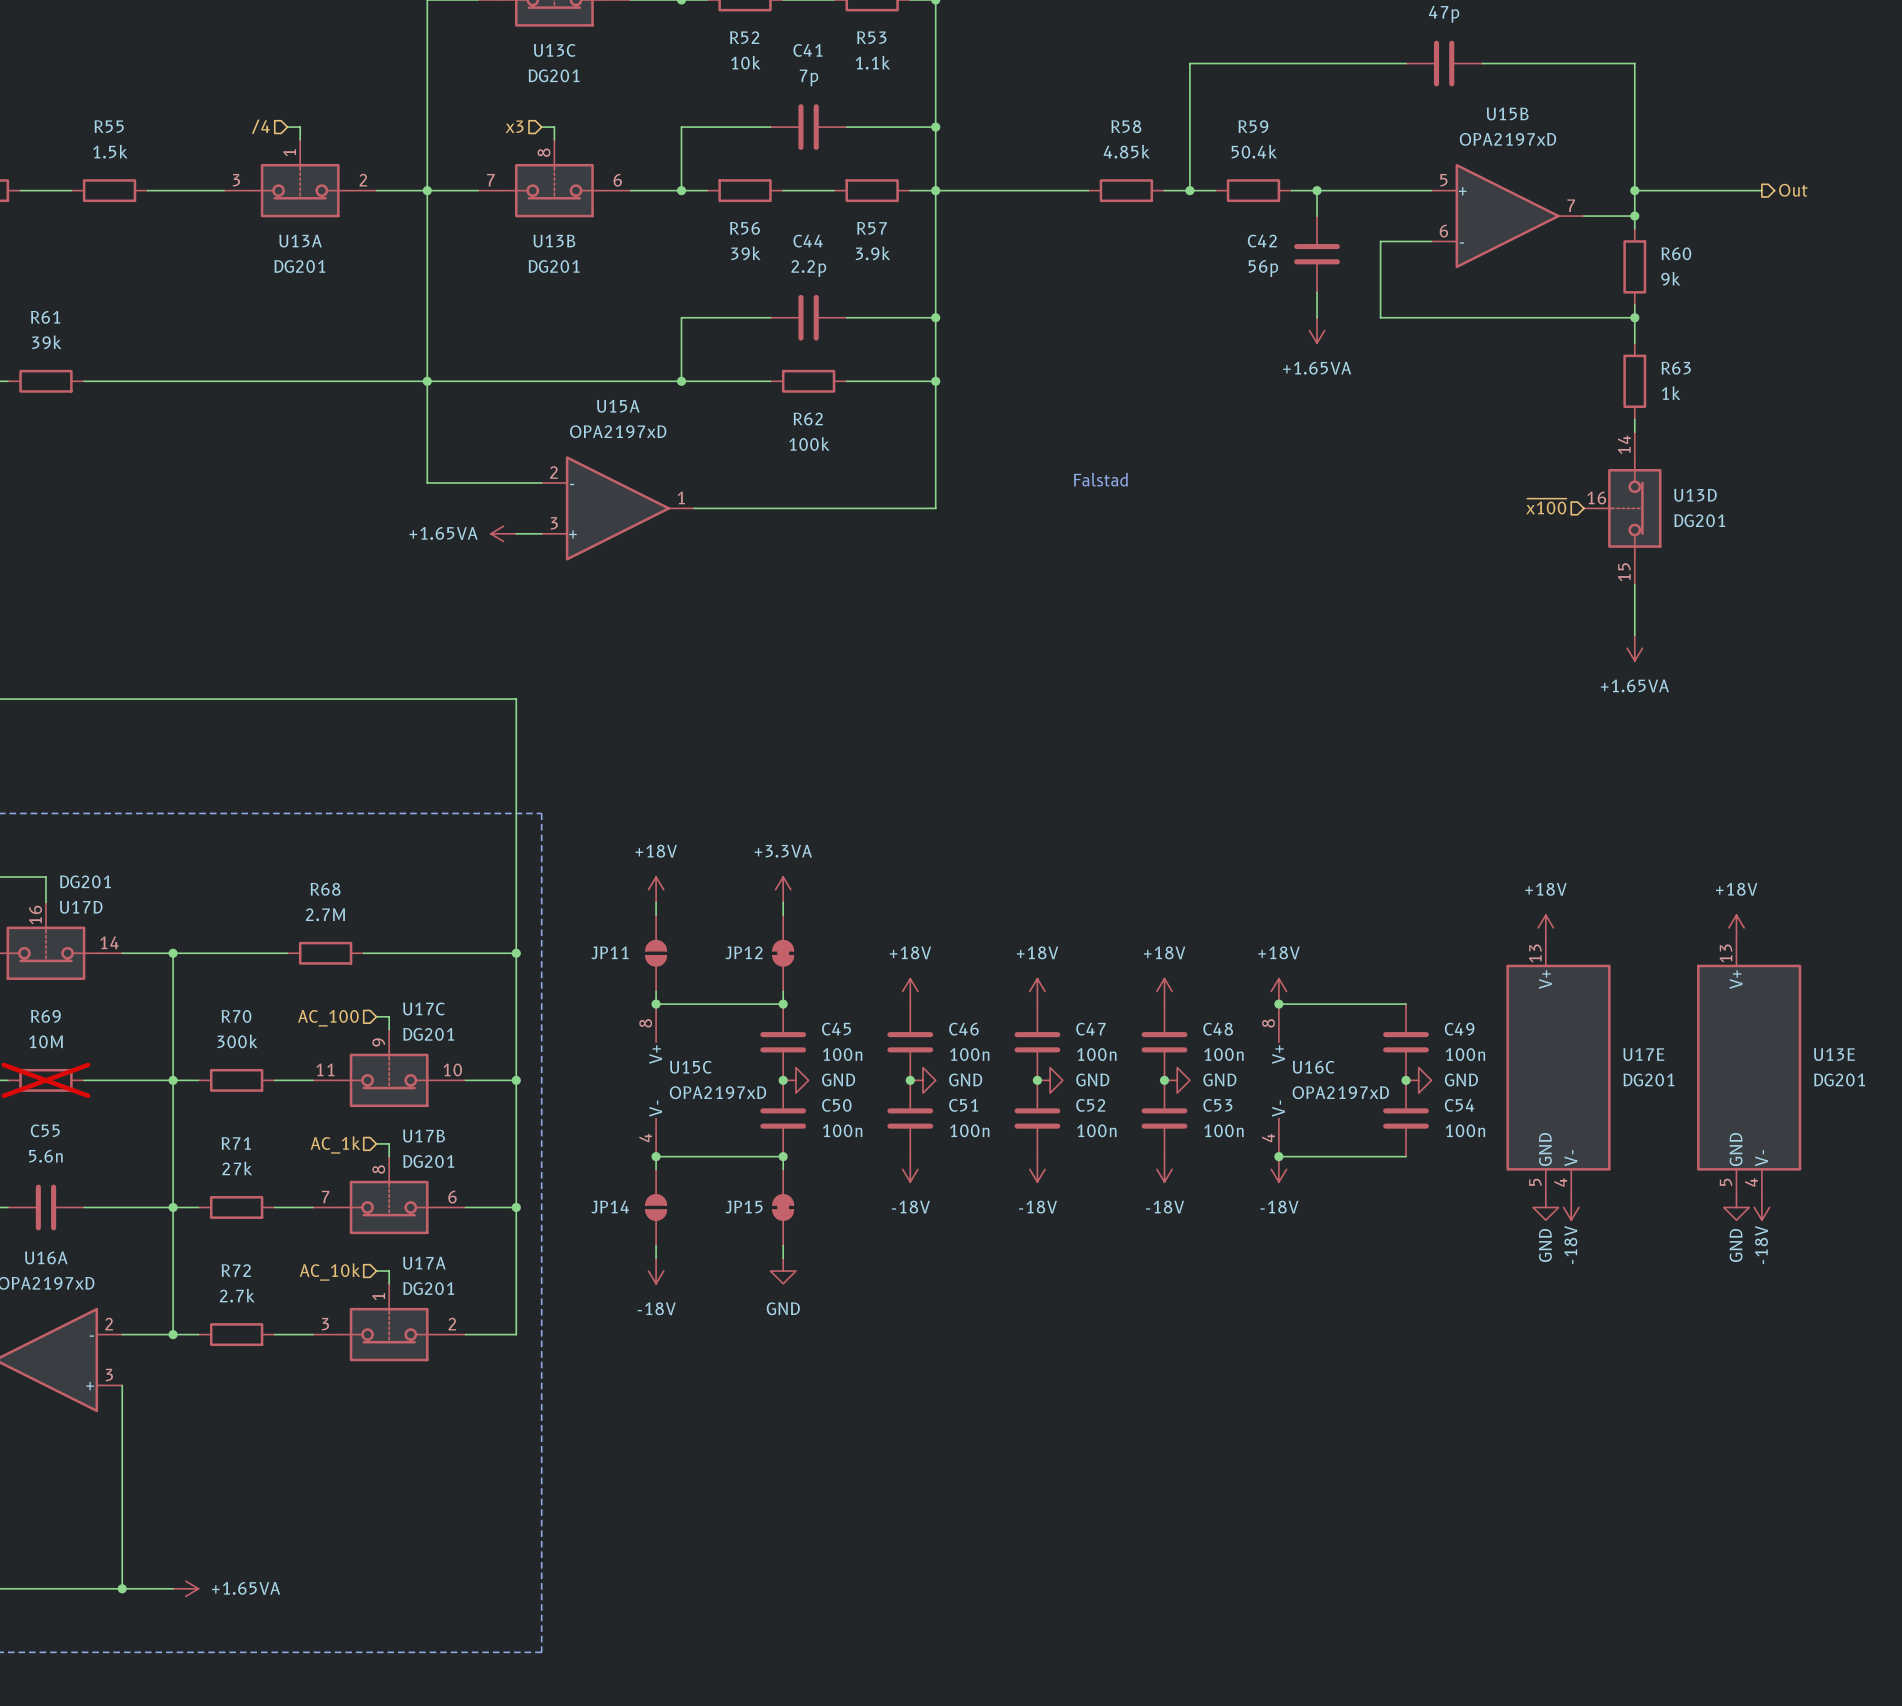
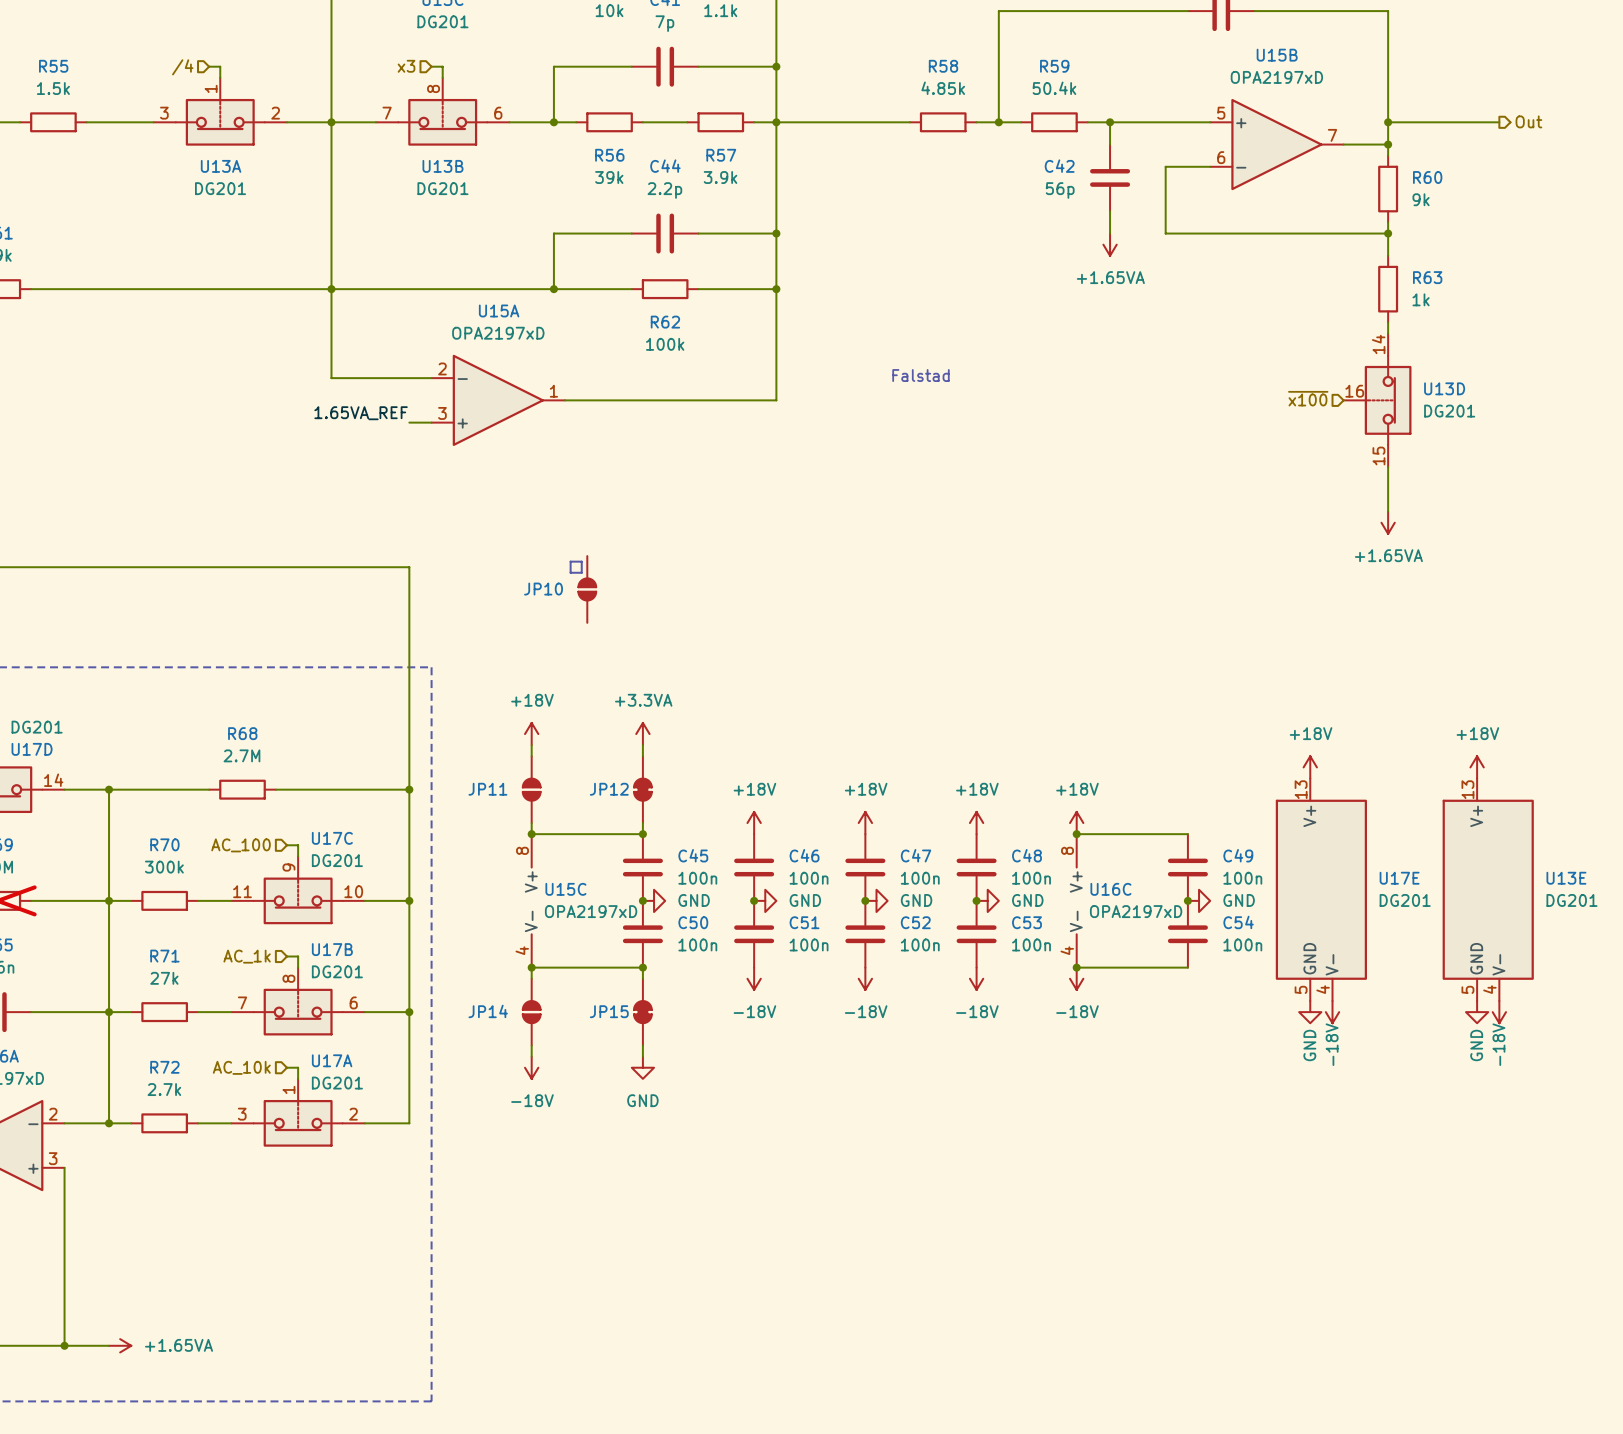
label: none -> 1.65VA_REF (361, 413)
power symbol: +1.65VA (503, 533) -> none
line: none -> (570, 561) (581, 561) (581, 572) (570, 572) (570, 561)
JP10: none -> (587, 589)

